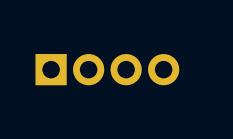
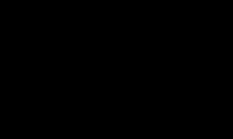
part: (107, 69) -> none

